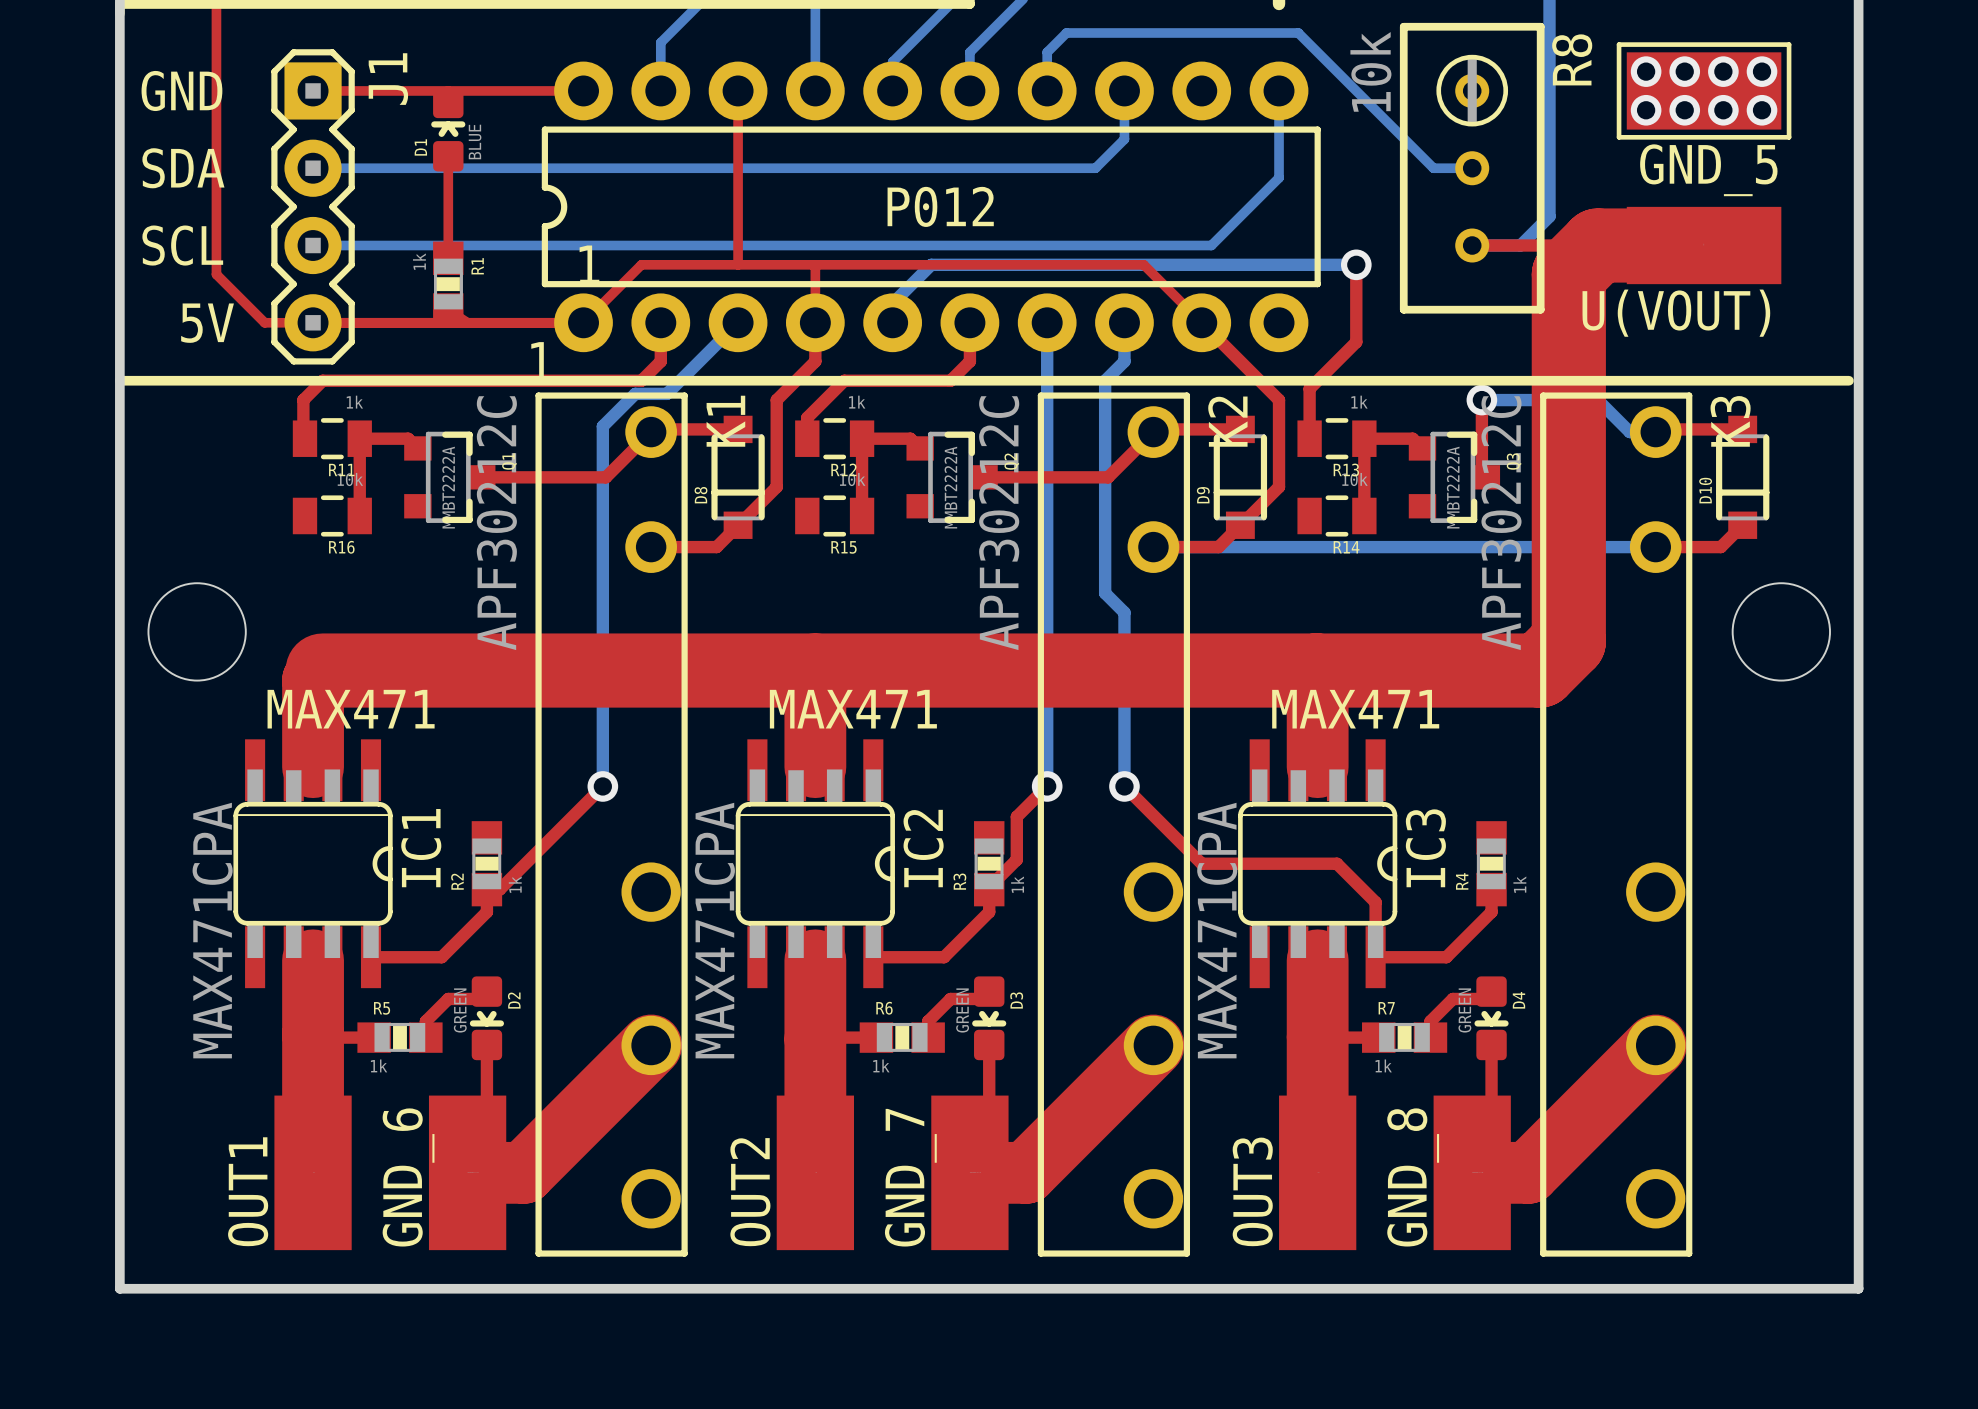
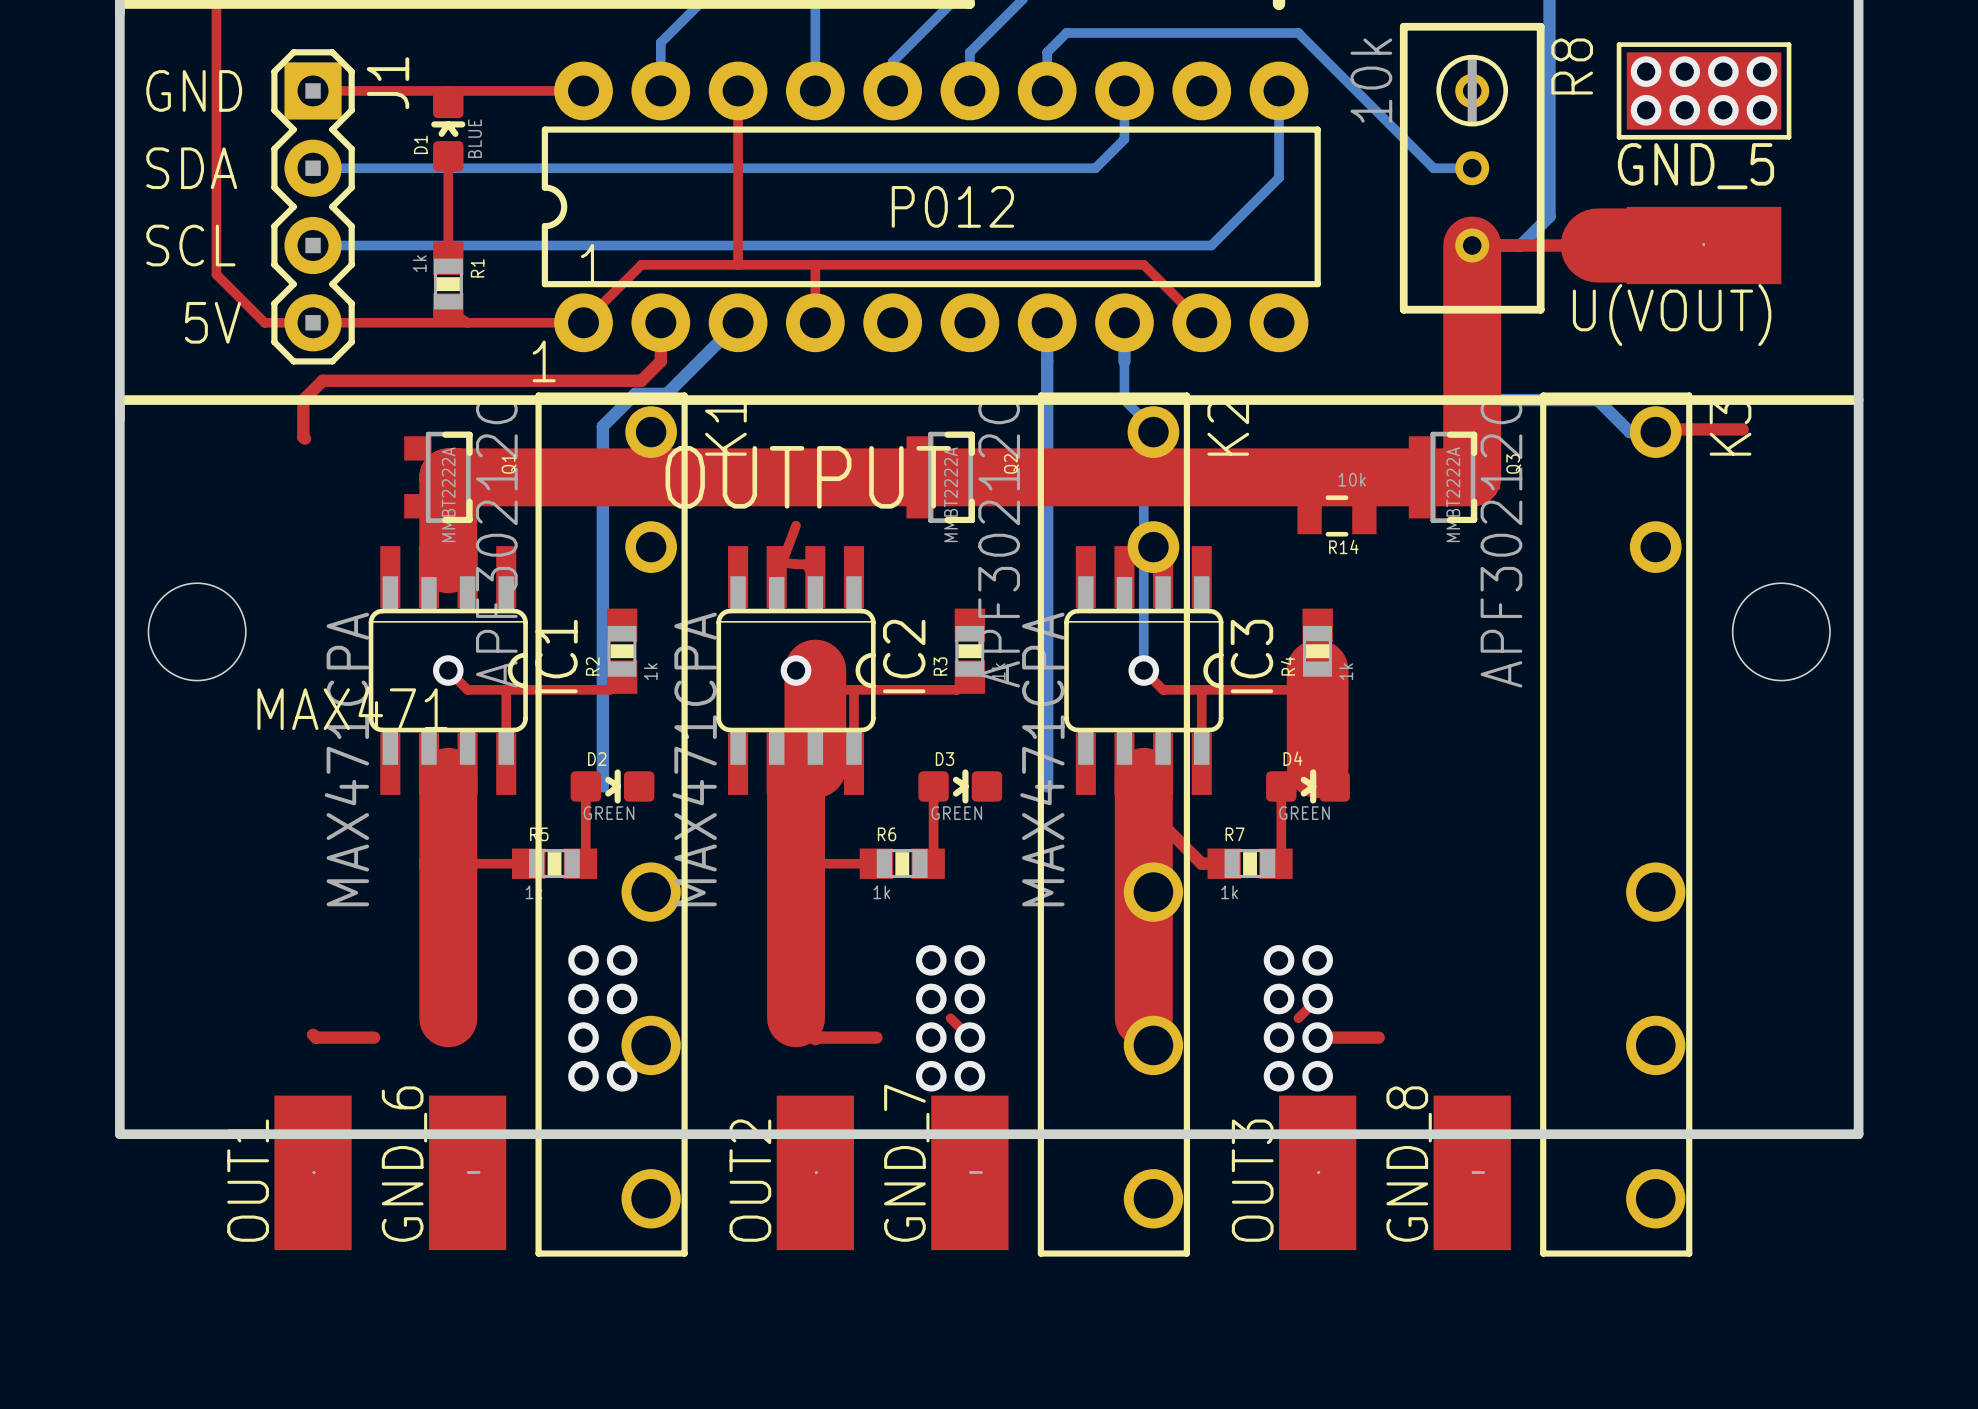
top track: (1597, 245) (1568, 274) (1568, 641) (1539, 670) (322, 670) (313, 680) (313, 767) -> none
bottom track: (1356, 264) (931, 264) (892, 303) (892, 322) -> none
top track: (1356, 264) (1356, 342) (1309, 388) (1309, 438) -> none
via: (1356, 264) -> none
top track: (1199, 320) (1279, 400) (1279, 487) (1240, 525) -> none
top track: (815, 322) (815, 361) (776, 400) (776, 487) (716, 547) (651, 547) -> none
top track: (969, 322) (969, 361) (950, 380) (844, 380) (807, 417) (807, 438) -> none
bottom track: (1124, 361) (1105, 380) (1105, 593) (1124, 612) (1124, 786) -> (1124, 361) (1124, 400) (1143, 419) (1143, 670)
line: (119, 380) (1848, 380) -> none
top track: (1481, 400) (1481, 472) (1486, 477) -> none
via: (1481, 400) -> none
line: none -> (1858, 400) (119, 400) (119, 419)
top track: (738, 429) (653, 429) (605, 477) -> (984, 477) (605, 477)
top track: (1240, 429) (1156, 429) (1108, 477) -> (1472, 245) (1472, 477) (1108, 477)
R11: 1k (332, 438) -> none
R12: 1k (834, 438) -> none
R13: 1k (1336, 438) -> none
top track: (417, 448) (408, 438) (359, 438) (359, 515) -> none
top track: (920, 448) (910, 438) (862, 438) (862, 515) -> none
top track: (1422, 448) (1412, 438) (1364, 438) (1364, 515) -> none
top track: none -> (481, 477) (448, 477) (448, 577)
top track width: thin (481, 477) (605, 477) -> thick (481, 477) (605, 477)
D8: (738, 477) -> none
text: none -> OUTPUT (808, 477)
top track width: thin (984, 477) (1108, 477) -> thick (984, 477) (1108, 477)
D9: (1240, 477) -> none
D10: (1742, 477) -> none
R16: 10k (332, 515) -> none
R15: 10k (834, 515) -> none
top track: none -> (796, 525) (776, 577)
top track: (1240, 525) (1218, 547) (1153, 547) -> none
top track: (1742, 525) (1720, 547) (1655, 547) -> none
bottom track: (1153, 547) (1655, 547) -> none
top track: none -> (782, 562) (805, 564) (815, 577)
top track: none -> (448, 670) (467, 689) (609, 689) (622, 677)
via: none -> (448, 670)
top track: none -> (796, 670) (815, 689) (957, 689) (969, 677)
via: none -> (796, 670)
top track: none -> (1143, 670) (1163, 689) (1304, 689) (1317, 677)
via: none -> (1143, 670)
top track: none -> (506, 689) (506, 764)
top track: none -> (854, 689) (854, 764)
top track: none -> (1201, 689) (1201, 764)
text: MAX471 (853, 709) -> none
text: MAX471 (1355, 709) -> none
top track: none -> (448, 776) (448, 1018)
top track: none -> (796, 776) (796, 1018)
top track: none -> (1143, 776) (1143, 1018)
top track: none -> (585, 786) (585, 858) (580, 863)
top track: (602, 786) (499, 889) (486, 889) (486, 912) (441, 957) (371, 957) -> none
via: (602, 786) -> none
top track: none -> (933, 786) (933, 863) (928, 863)
top track: (1047, 786) (1016, 816) (1016, 859) (989, 887) (989, 912) (944, 957) (873, 957) -> none
via: (1047, 786) -> none
via: (1124, 786) -> none
IC1 position: (313, 863) -> (448, 670)
top track: none -> (448, 863) (528, 863)
R2 position: (486, 863) -> (622, 651)
top track: none -> (796, 863) (876, 863)
IC2 position: (815, 863) -> (796, 670)
R3 position: (989, 863) -> (969, 651)
top track: (1224, 863) (1275, 863) -> none
top track: (1281, 863) (1336, 863) (1375, 902) (1375, 957) (1446, 957) (1491, 912) (1491, 889) -> (1281, 863) (1281, 786)
IC3 position: (1317, 863) -> (1143, 670)
R4 position: (1491, 863) -> (1317, 651)
top track: (313, 960) (313, 1172) -> none
via: none -> (583, 960)
via: none -> (622, 960)
top track: (815, 960) (815, 1172) -> none
via: none -> (931, 960)
via: none -> (969, 960)
via: none -> (1279, 960)
top track: (1317, 960) (1317, 1172) -> none
via: none -> (1317, 960)
top track: (486, 991) (479, 998) (448, 998) (425, 1021) (425, 1037) -> none
top track: (989, 991) (981, 998) (950, 998) (928, 1021) (928, 1037) -> none
top track: (1491, 991) (1484, 998) (1452, 998) (1430, 1021) (1430, 1037) -> none
via: none -> (583, 998)
via: none -> (622, 998)
via: none -> (931, 998)
via: none -> (969, 998)
via: none -> (1279, 998)
top track: none -> (1317, 998) (1298, 1018)
via: none -> (1317, 998)
D2 rotation: 0° (486, 1018) -> 90° counterclockwise (612, 786)
D2 position: (486, 1018) -> (612, 786)
top track: none -> (950, 1018) (969, 1037)
D3 rotation: 0° (989, 1018) -> 90° counterclockwise (960, 786)
D3 position: (989, 1018) -> (960, 786)
D4 rotation: 0° (1491, 1018) -> 90° counterclockwise (1308, 786)
D4 position: (1491, 1018) -> (1308, 786)
R5 position: (399, 1037) -> (554, 863)
via: none -> (583, 1037)
R6 position: (902, 1037) -> (902, 863)
via: none -> (931, 1037)
via: none -> (969, 1037)
via: none -> (1279, 1037)
via: none -> (1317, 1037)
R7 position: (1404, 1037) -> (1250, 863)
top track: (486, 1044) (486, 1153) (467, 1172) (523, 1172) (651, 1045) -> none
top track: (989, 1044) (989, 1153) (969, 1172) (1026, 1172) (1153, 1045) -> none
top track: (1491, 1044) (1491, 1153) (1472, 1172) (1528, 1172) (1655, 1045) -> none
via: none -> (583, 1076)
via: none -> (622, 1076)
via: none -> (931, 1076)
via: none -> (969, 1076)
via: none -> (1279, 1076)
via: none -> (1317, 1076)
board edge: (119, 1134) (119, 1288) (1858, 1288) (1858, 1134) -> (119, 1134) (1858, 1134)

